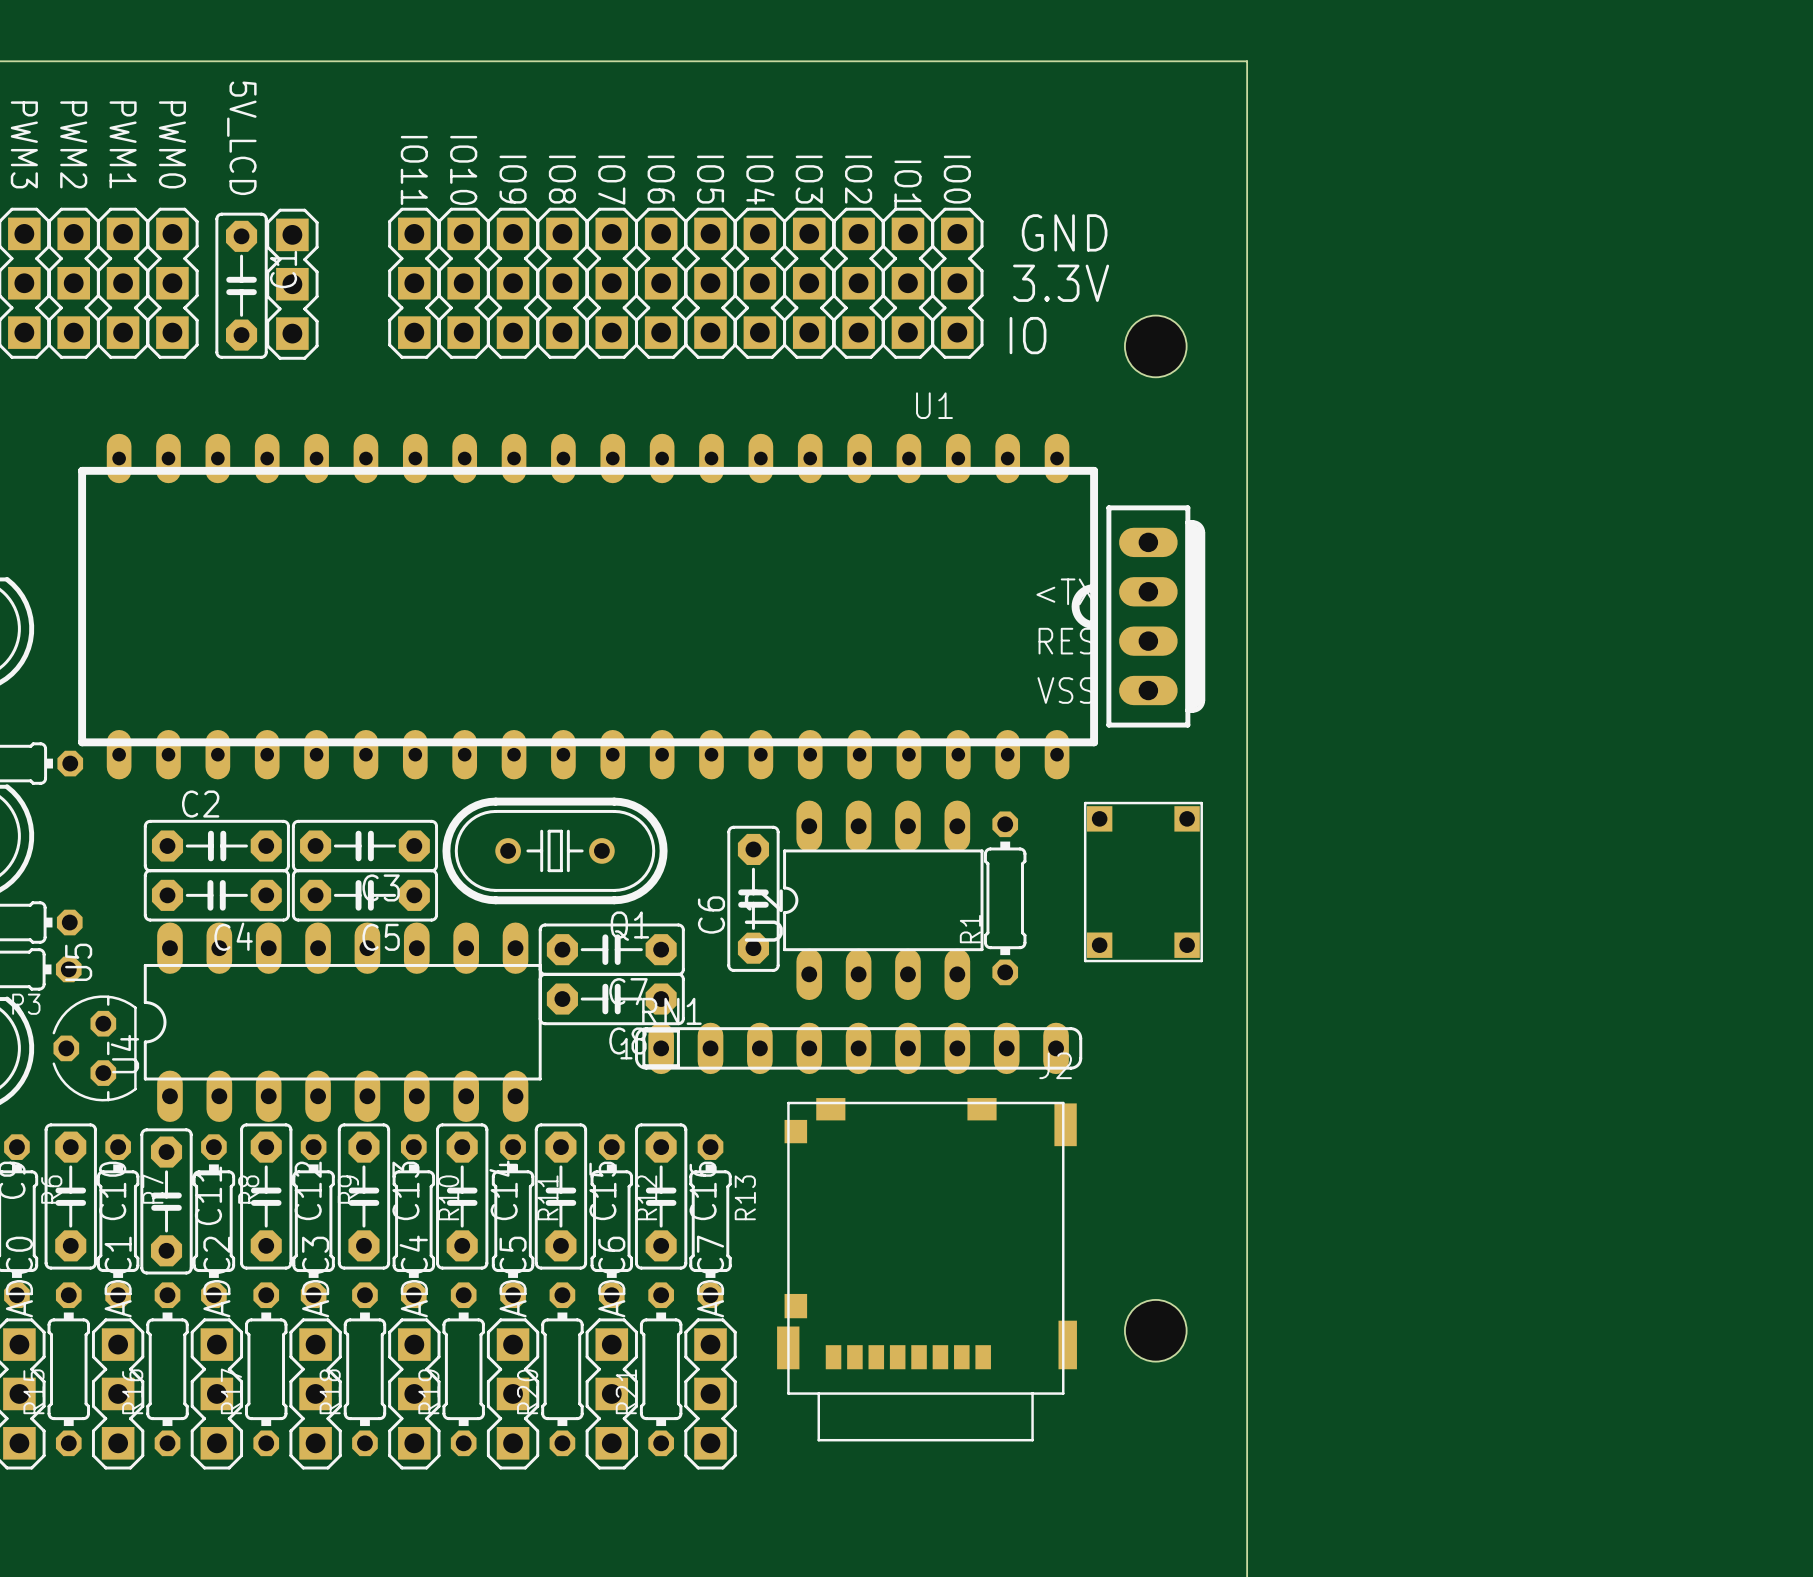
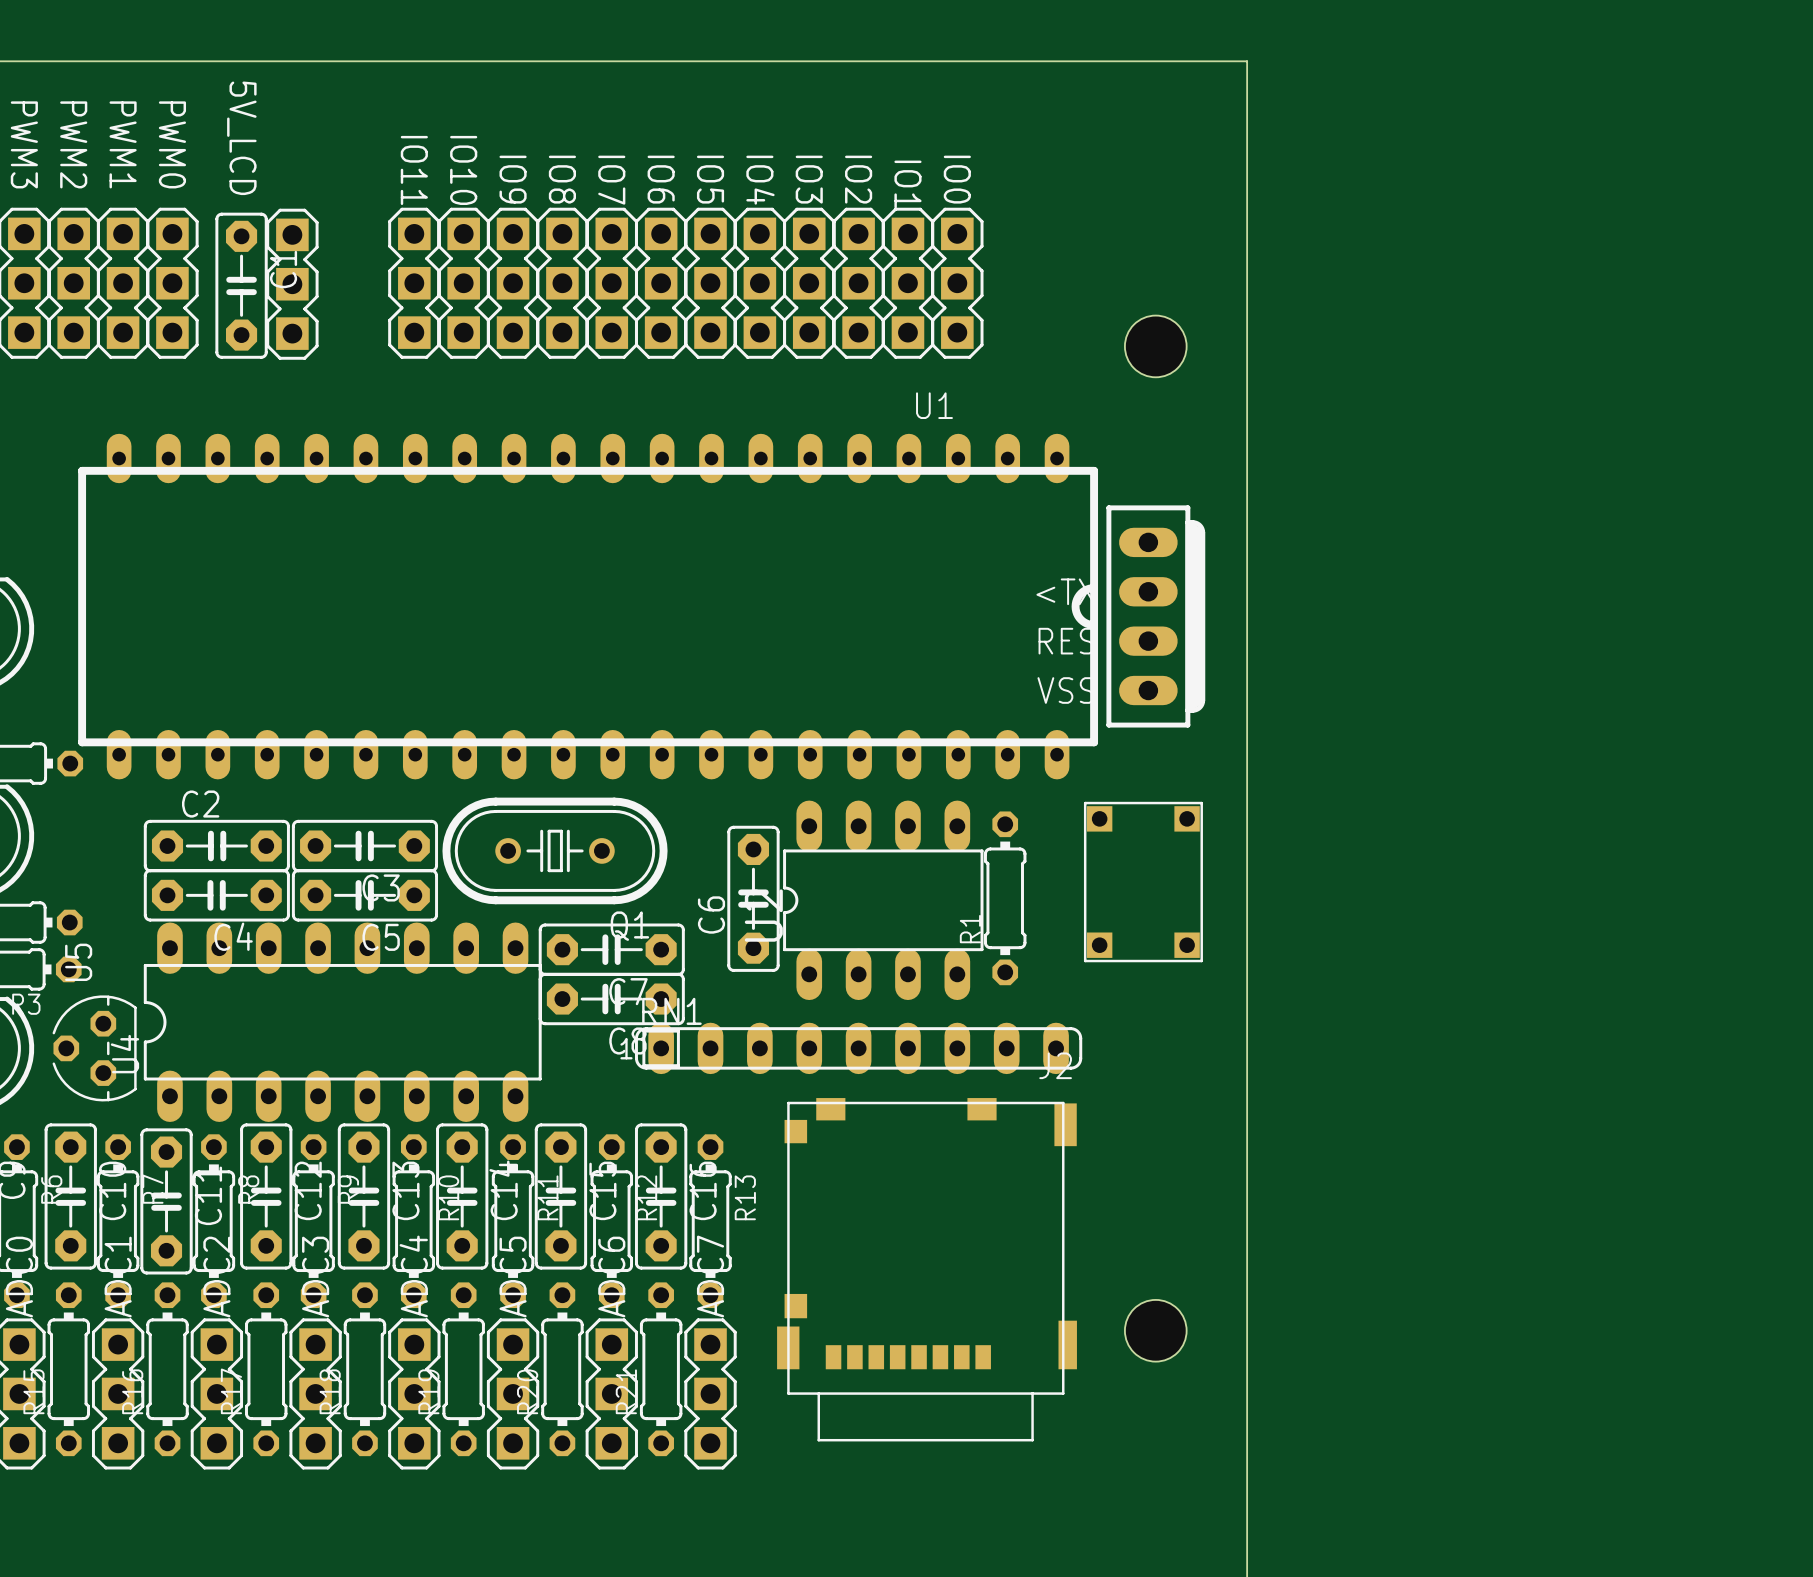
text: GND (1064, 232) -> none
text: 3.3V (1061, 283) -> none
text: IO (1028, 335) -> none

